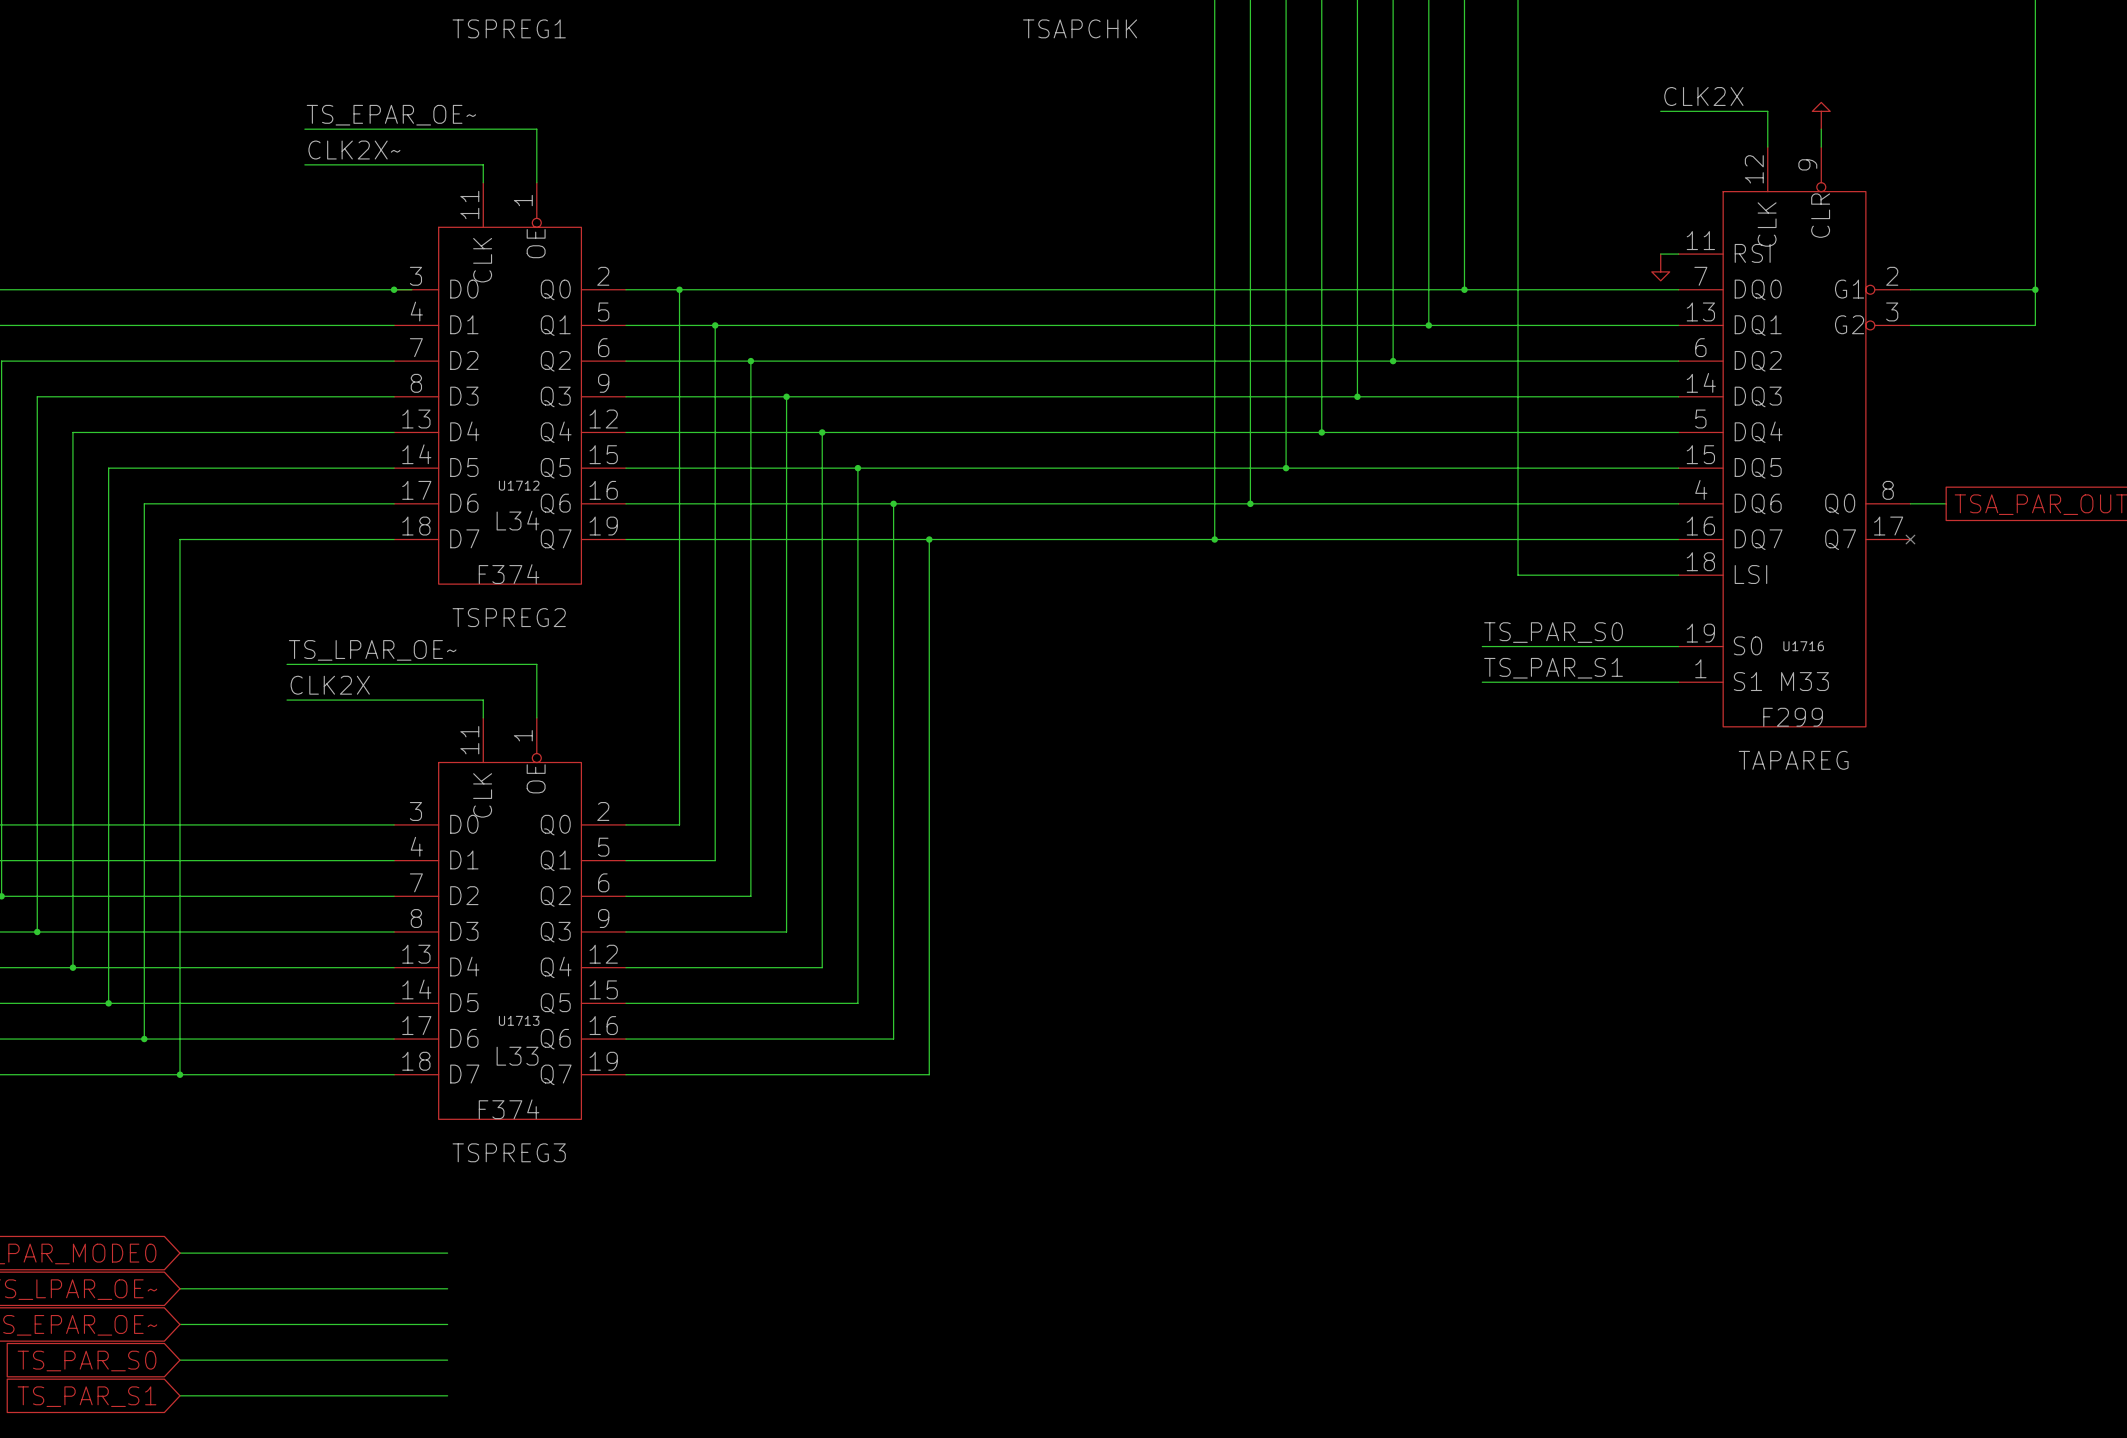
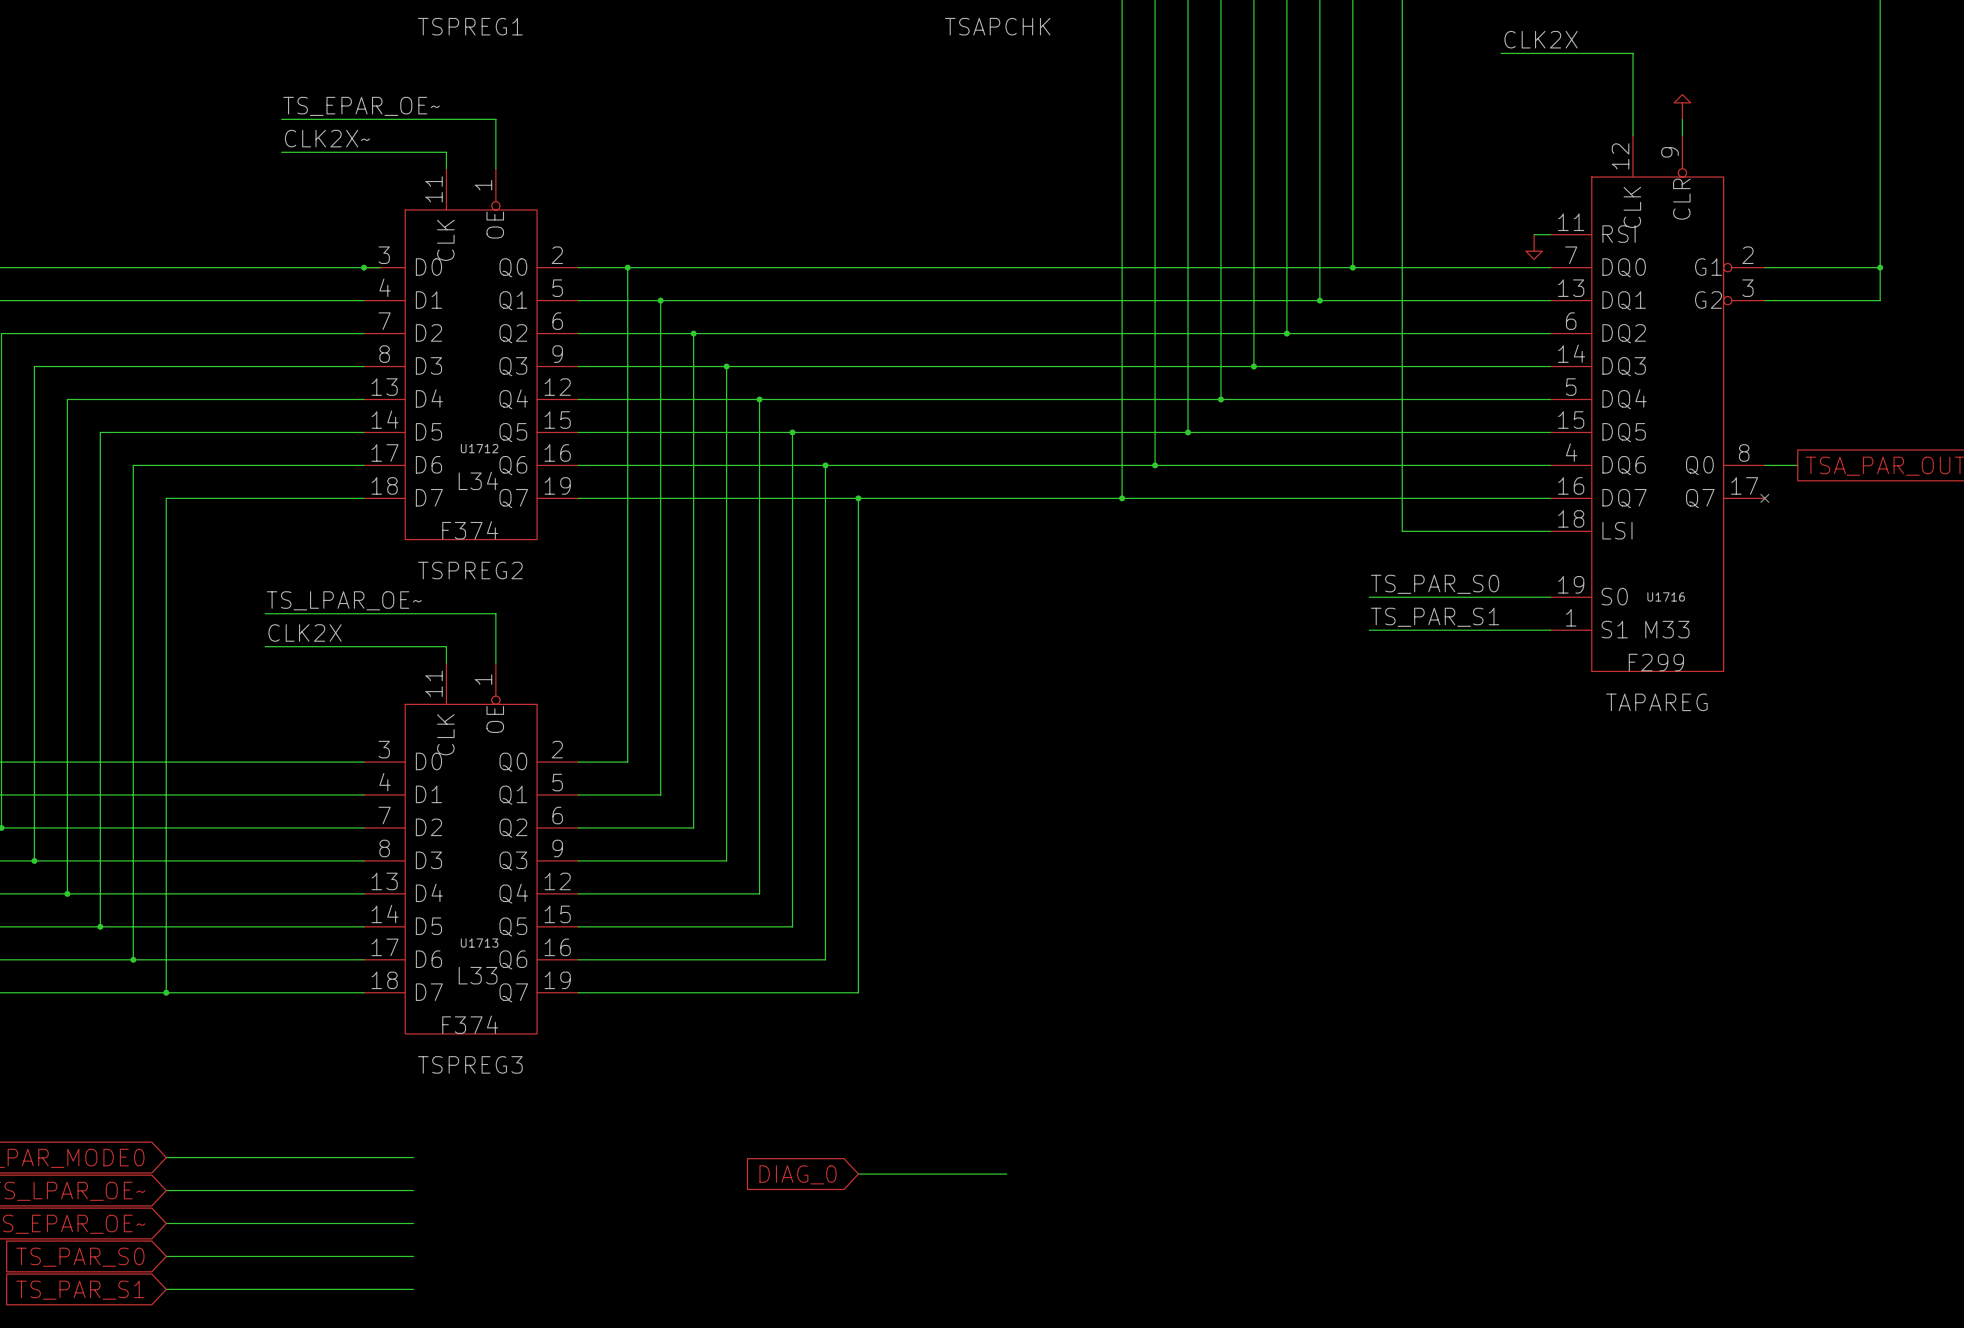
label position: CLK2X (1703, 96) -> CLK2X (1541, 39)
wire: (1660, 111) (1767, 111) -> (1501, 53) (1632, 53) (1632, 102)
wire: none -> (858, 1174) (1006, 1174)
global label: none -> DIAG_0 (798, 1174)

